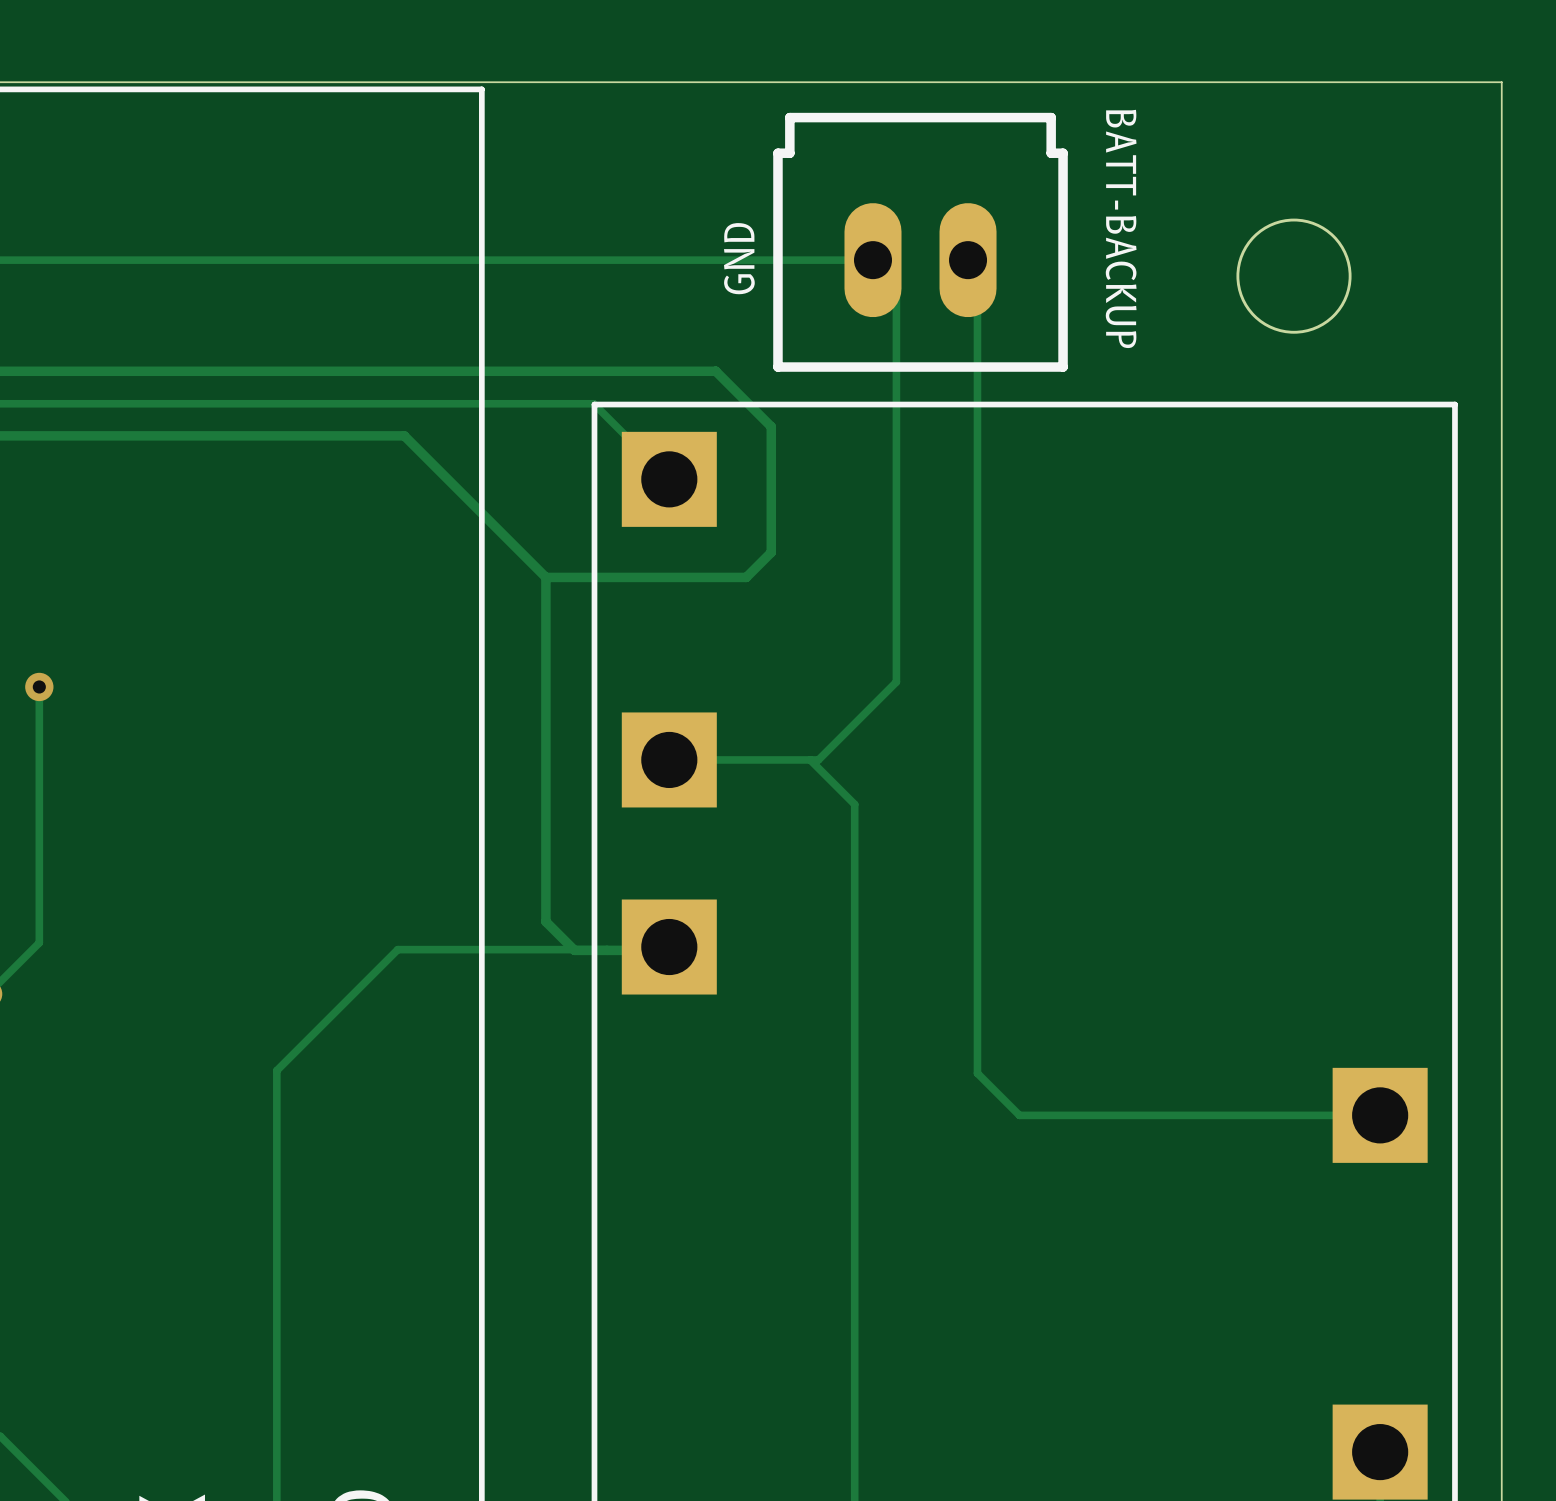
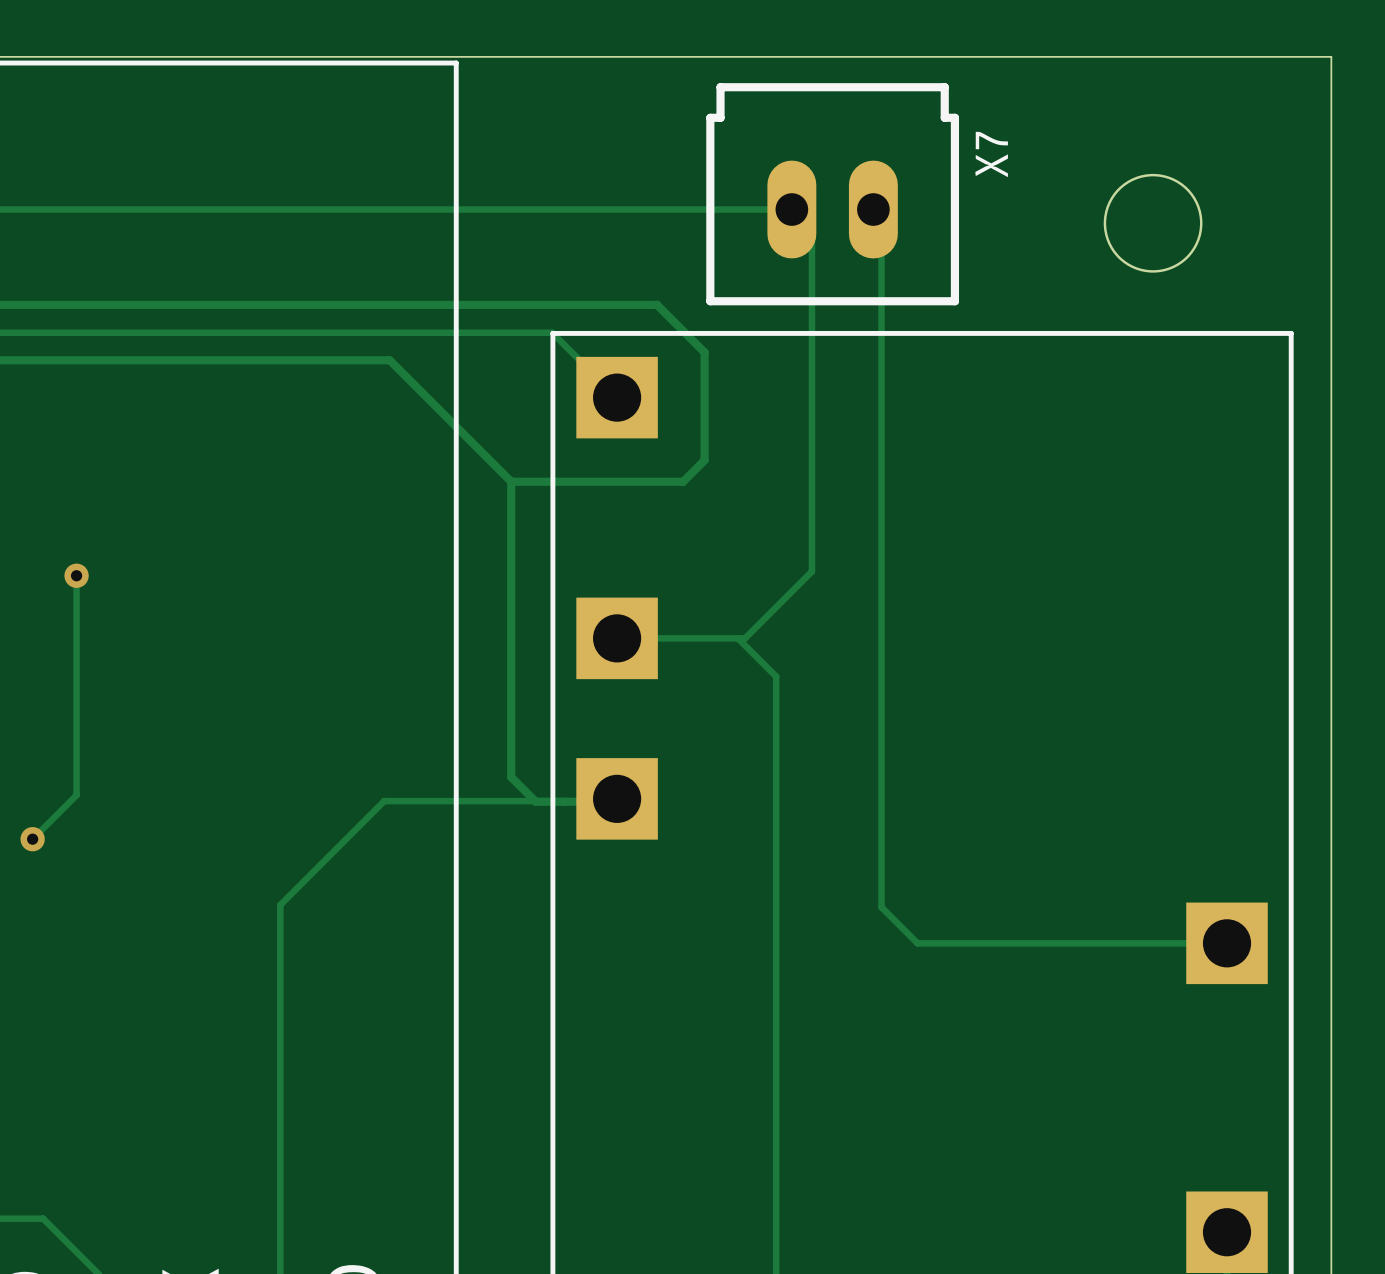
X7 name: none -> X7 (991, 154)
text: BATT-BACKUP (1121, 228) -> none
text: GND (739, 258) -> none

